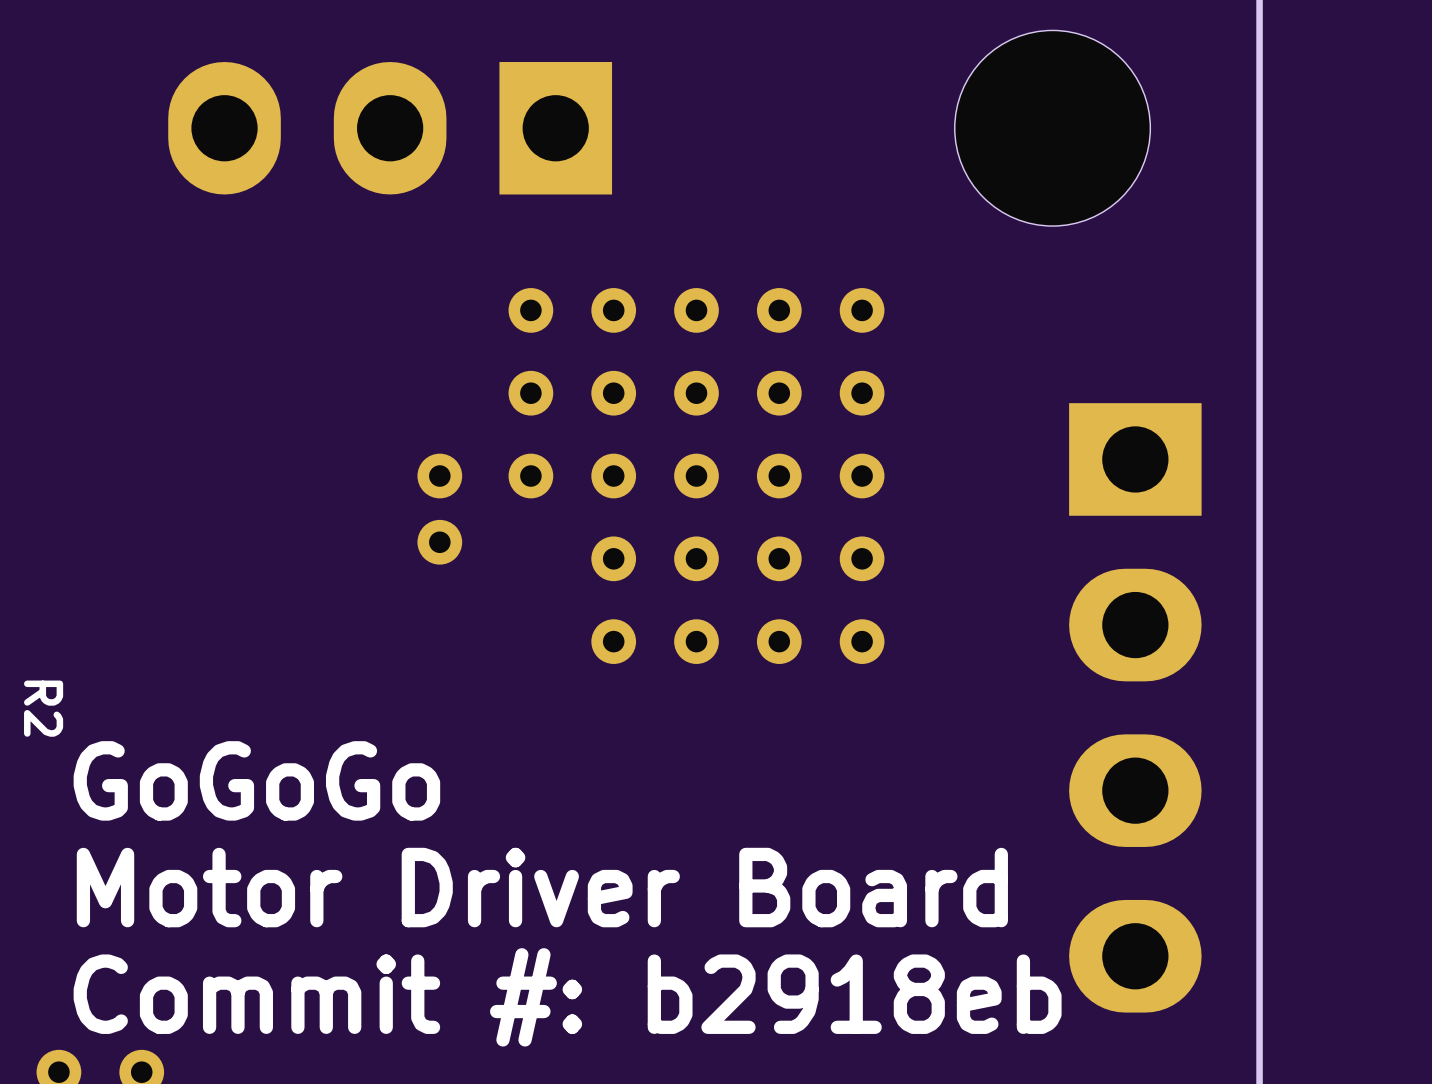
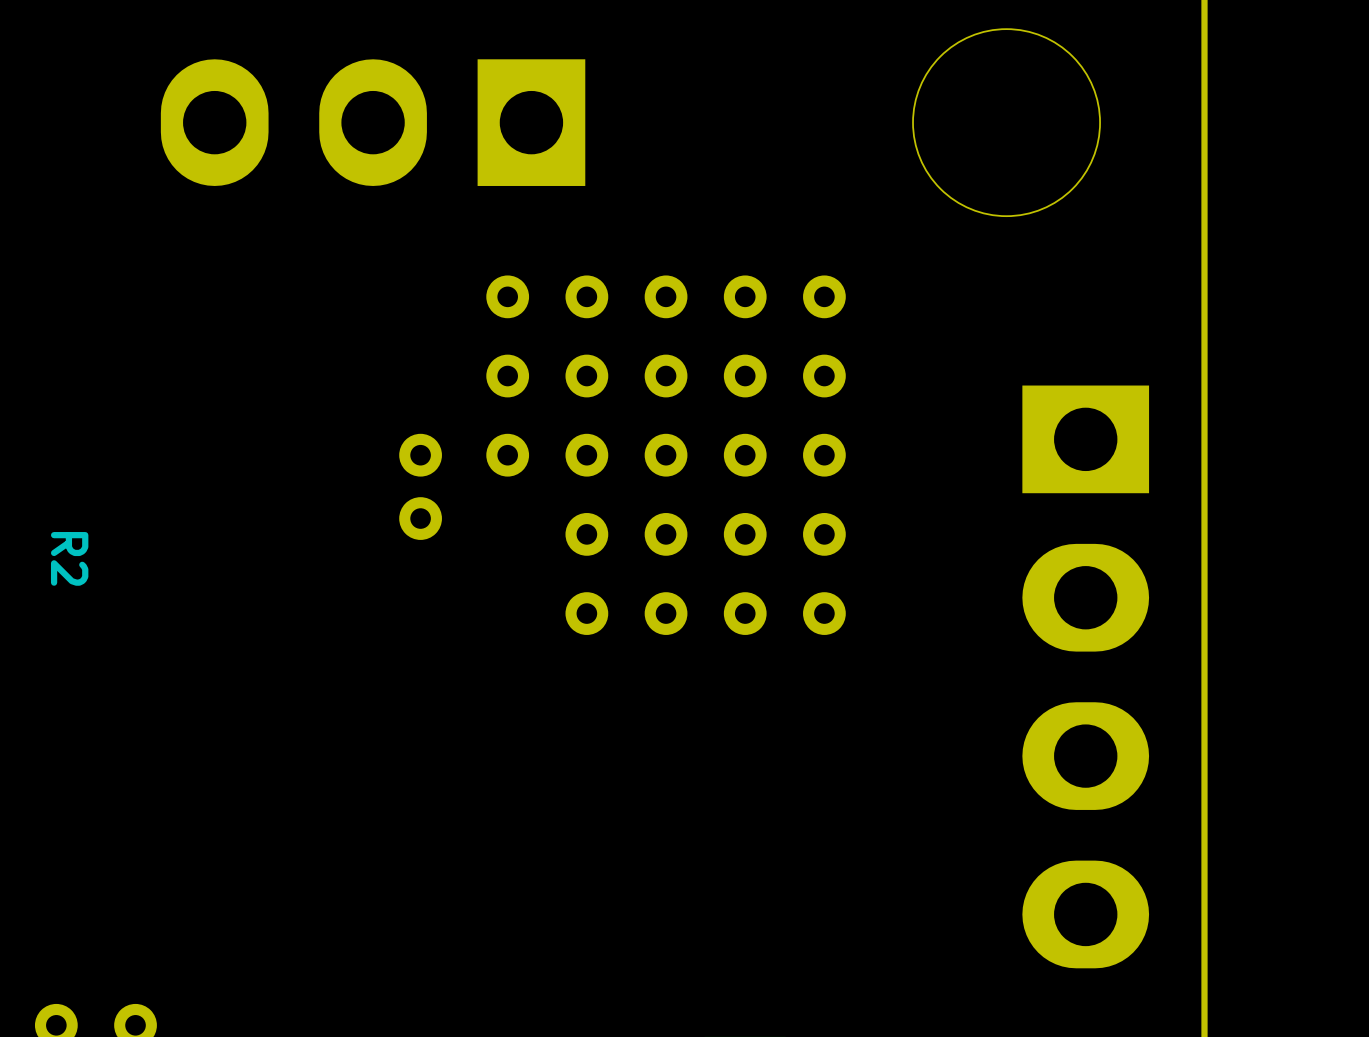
R2 name position: R2 (43, 708) -> R2 (69, 558)
text: GoGoGo (256, 780) -> none
text: Motor Driver Board (542, 887) -> none
text: Commit #: b2918eb (567, 997) -> none

